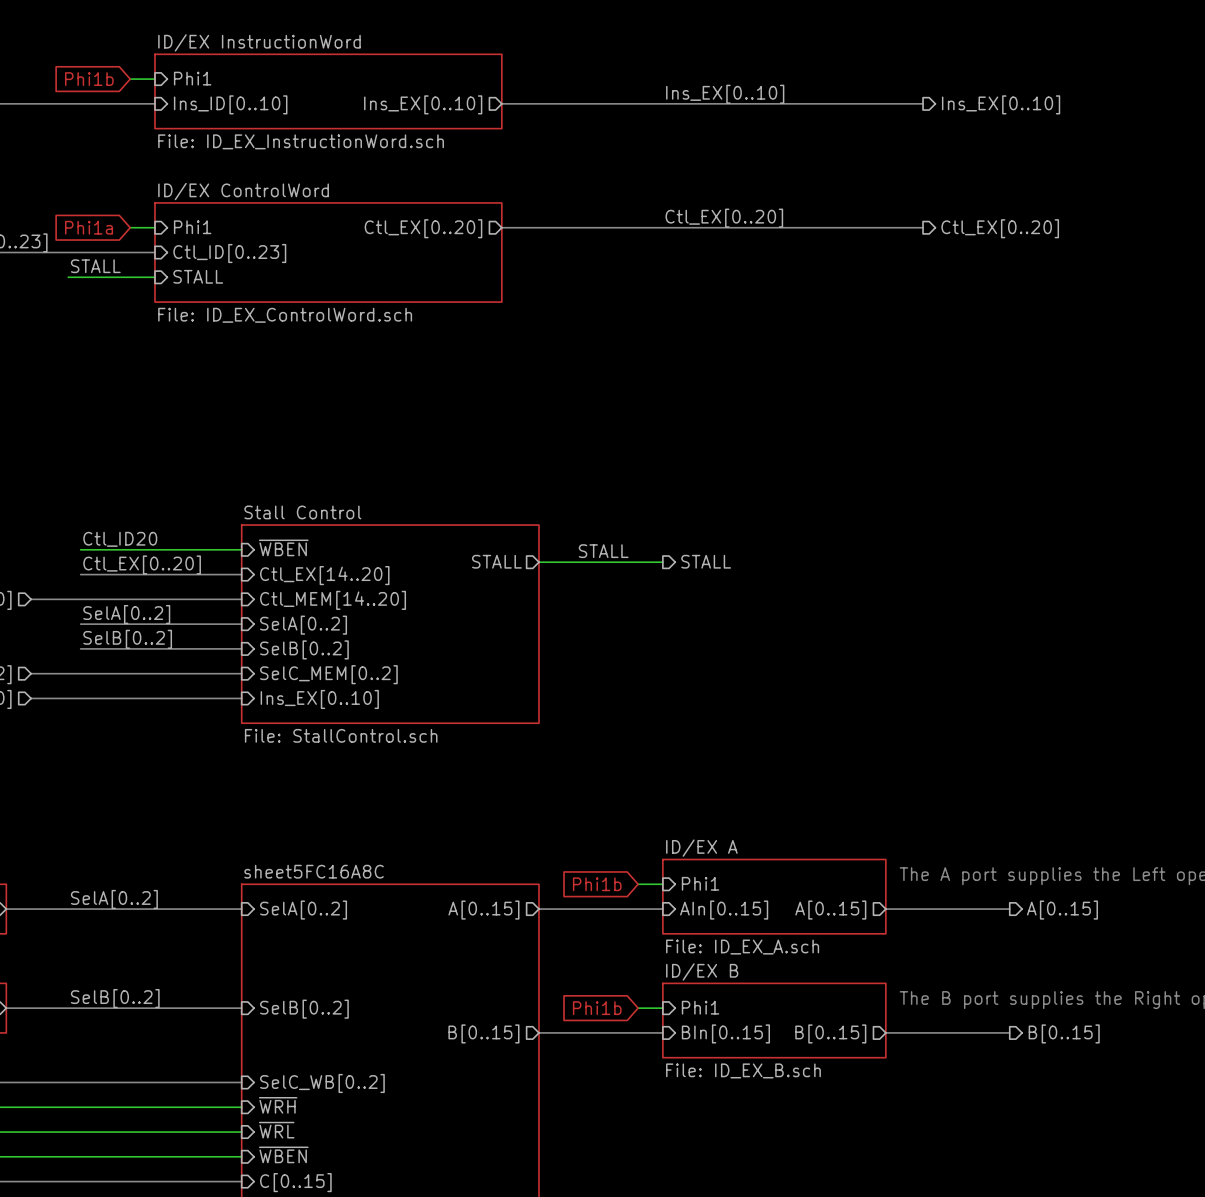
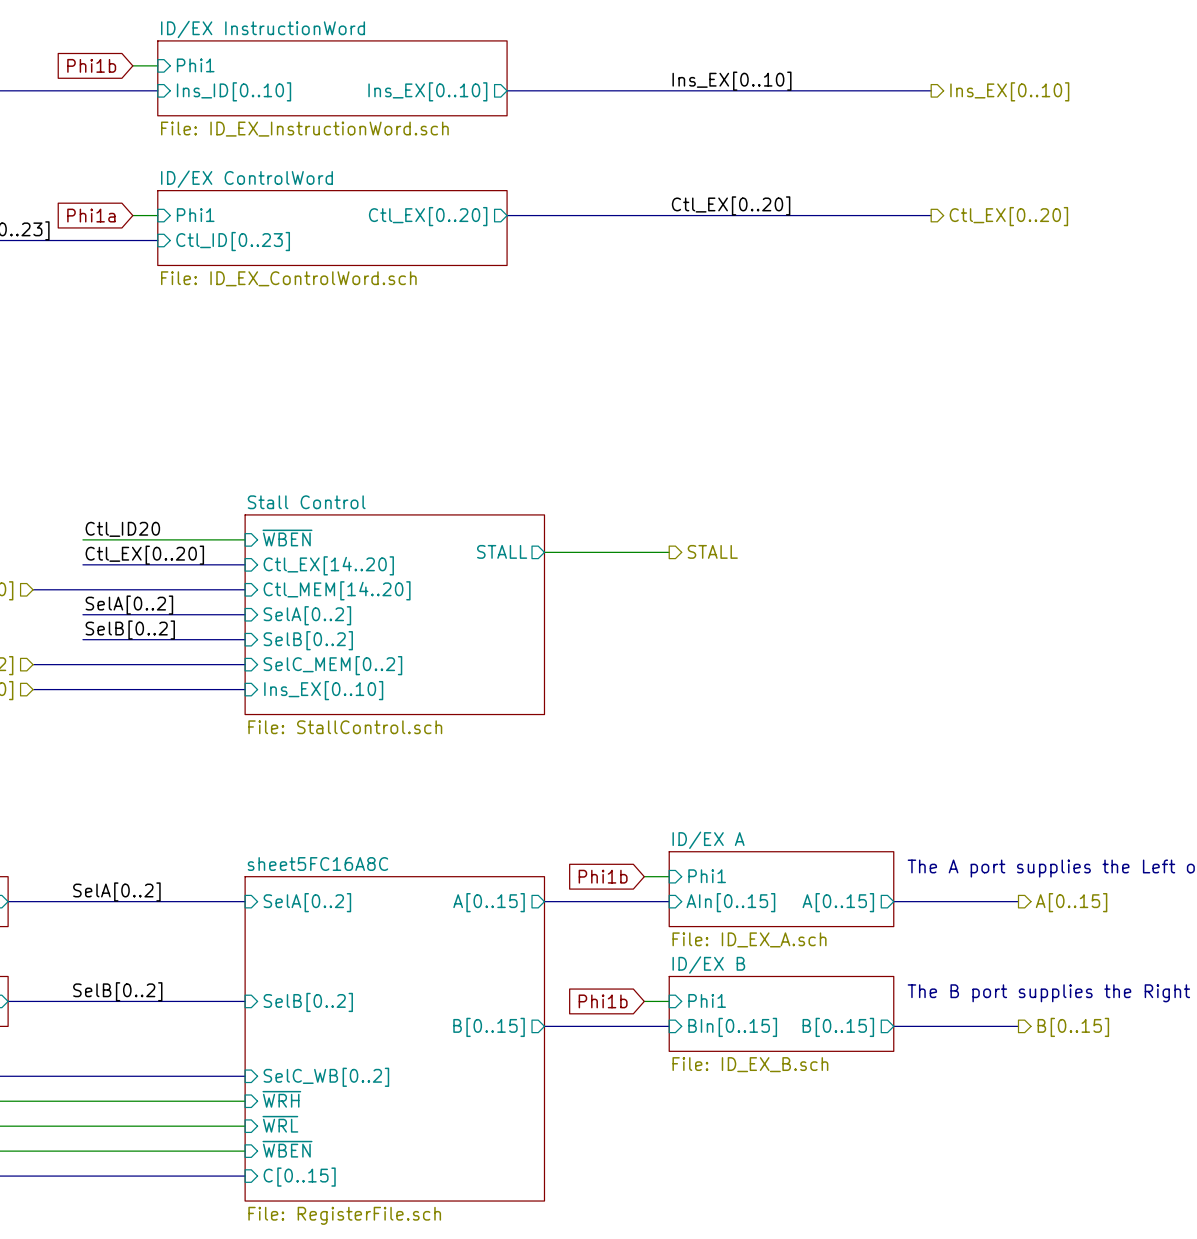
sheet ID/EX ControlWord: none -> File: ID_EX_ControlWord.sch (332, 228)
sheet ID/EX ControlWord: File: ID_EX_ControlWord.sch (328, 252) -> none
label: STALL (95, 266) -> none
sheet pin: STALL (198, 276) -> none
wire: (68, 277) (154, 277) -> none
label: STALL (603, 551) -> none

